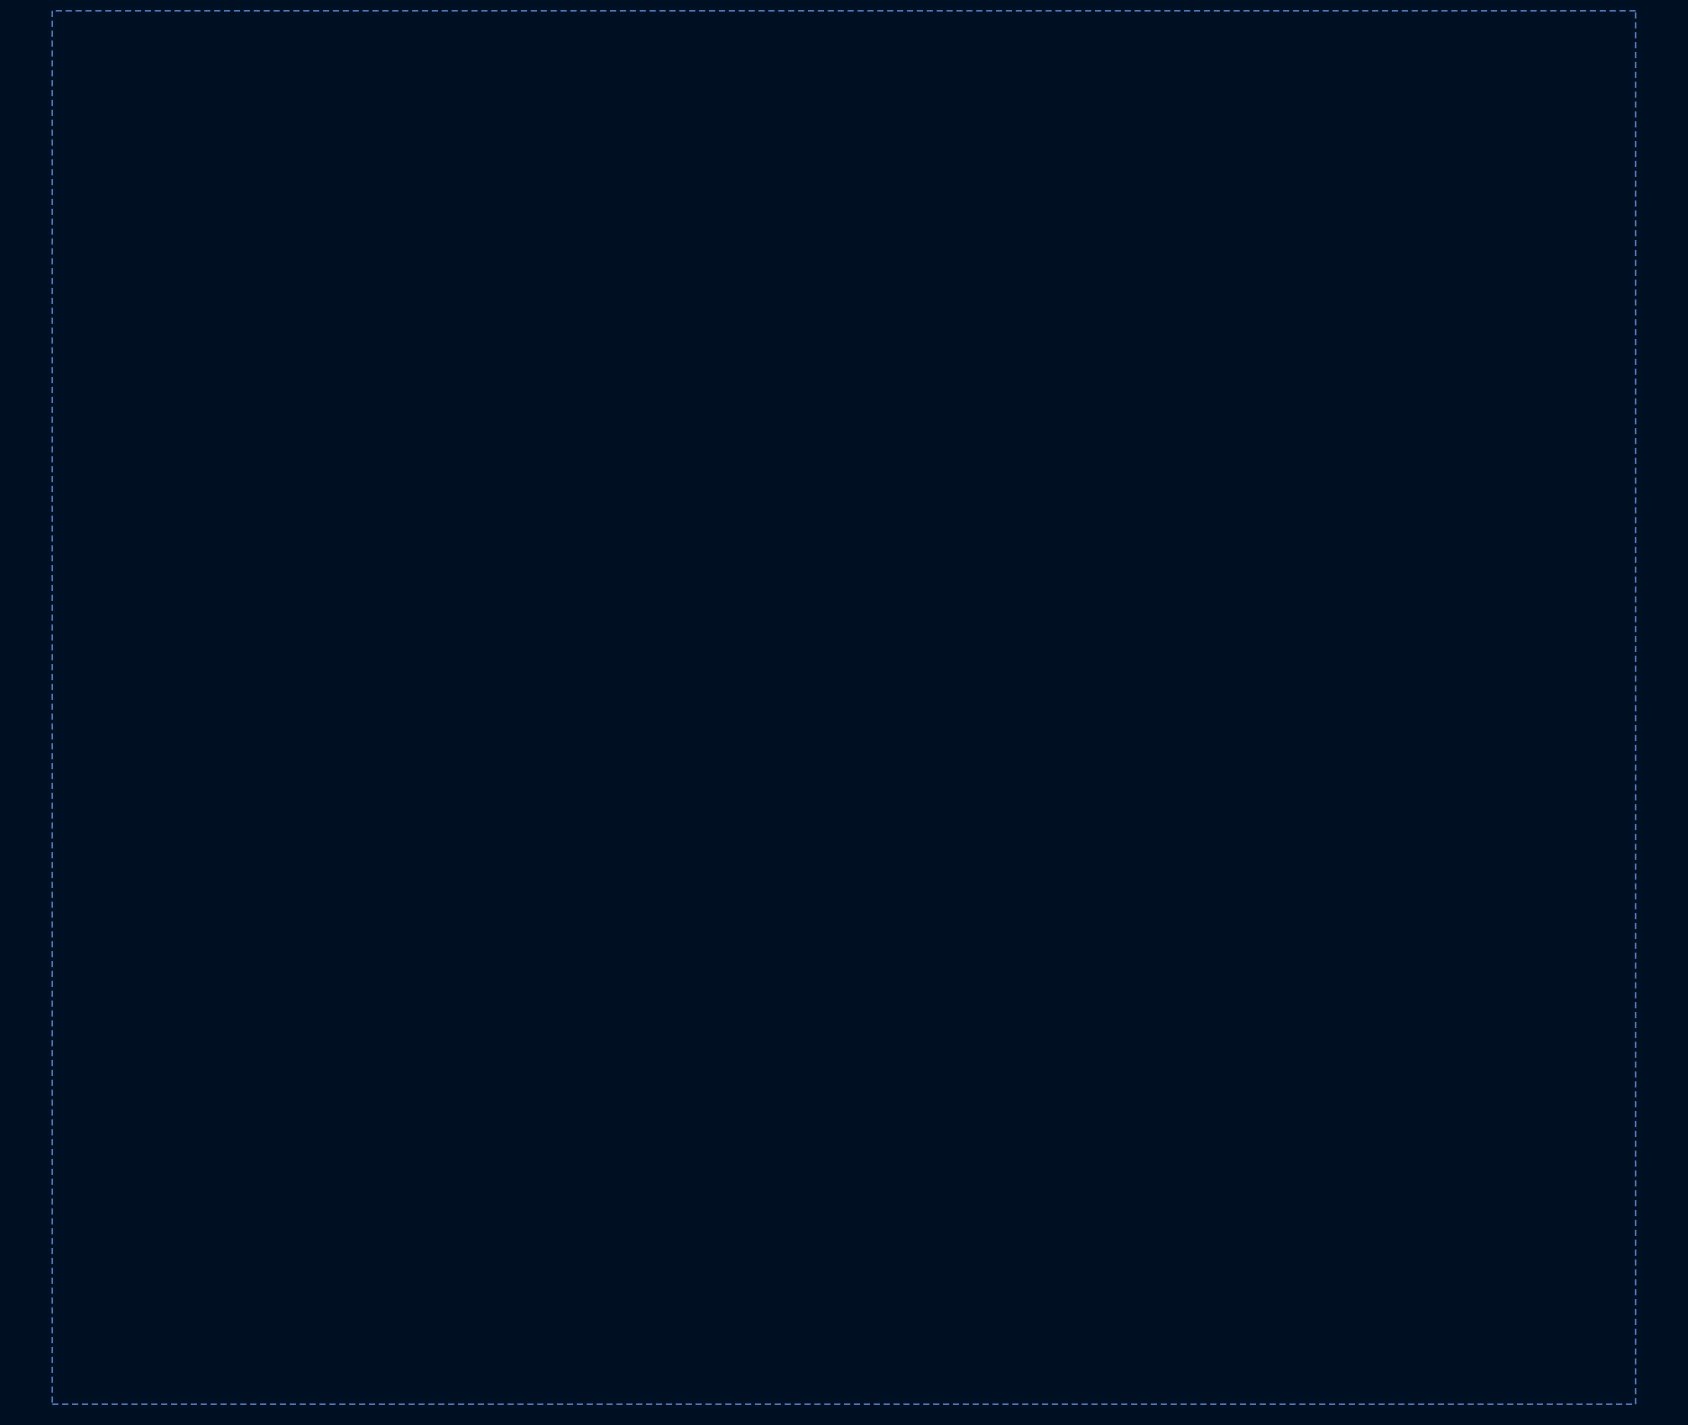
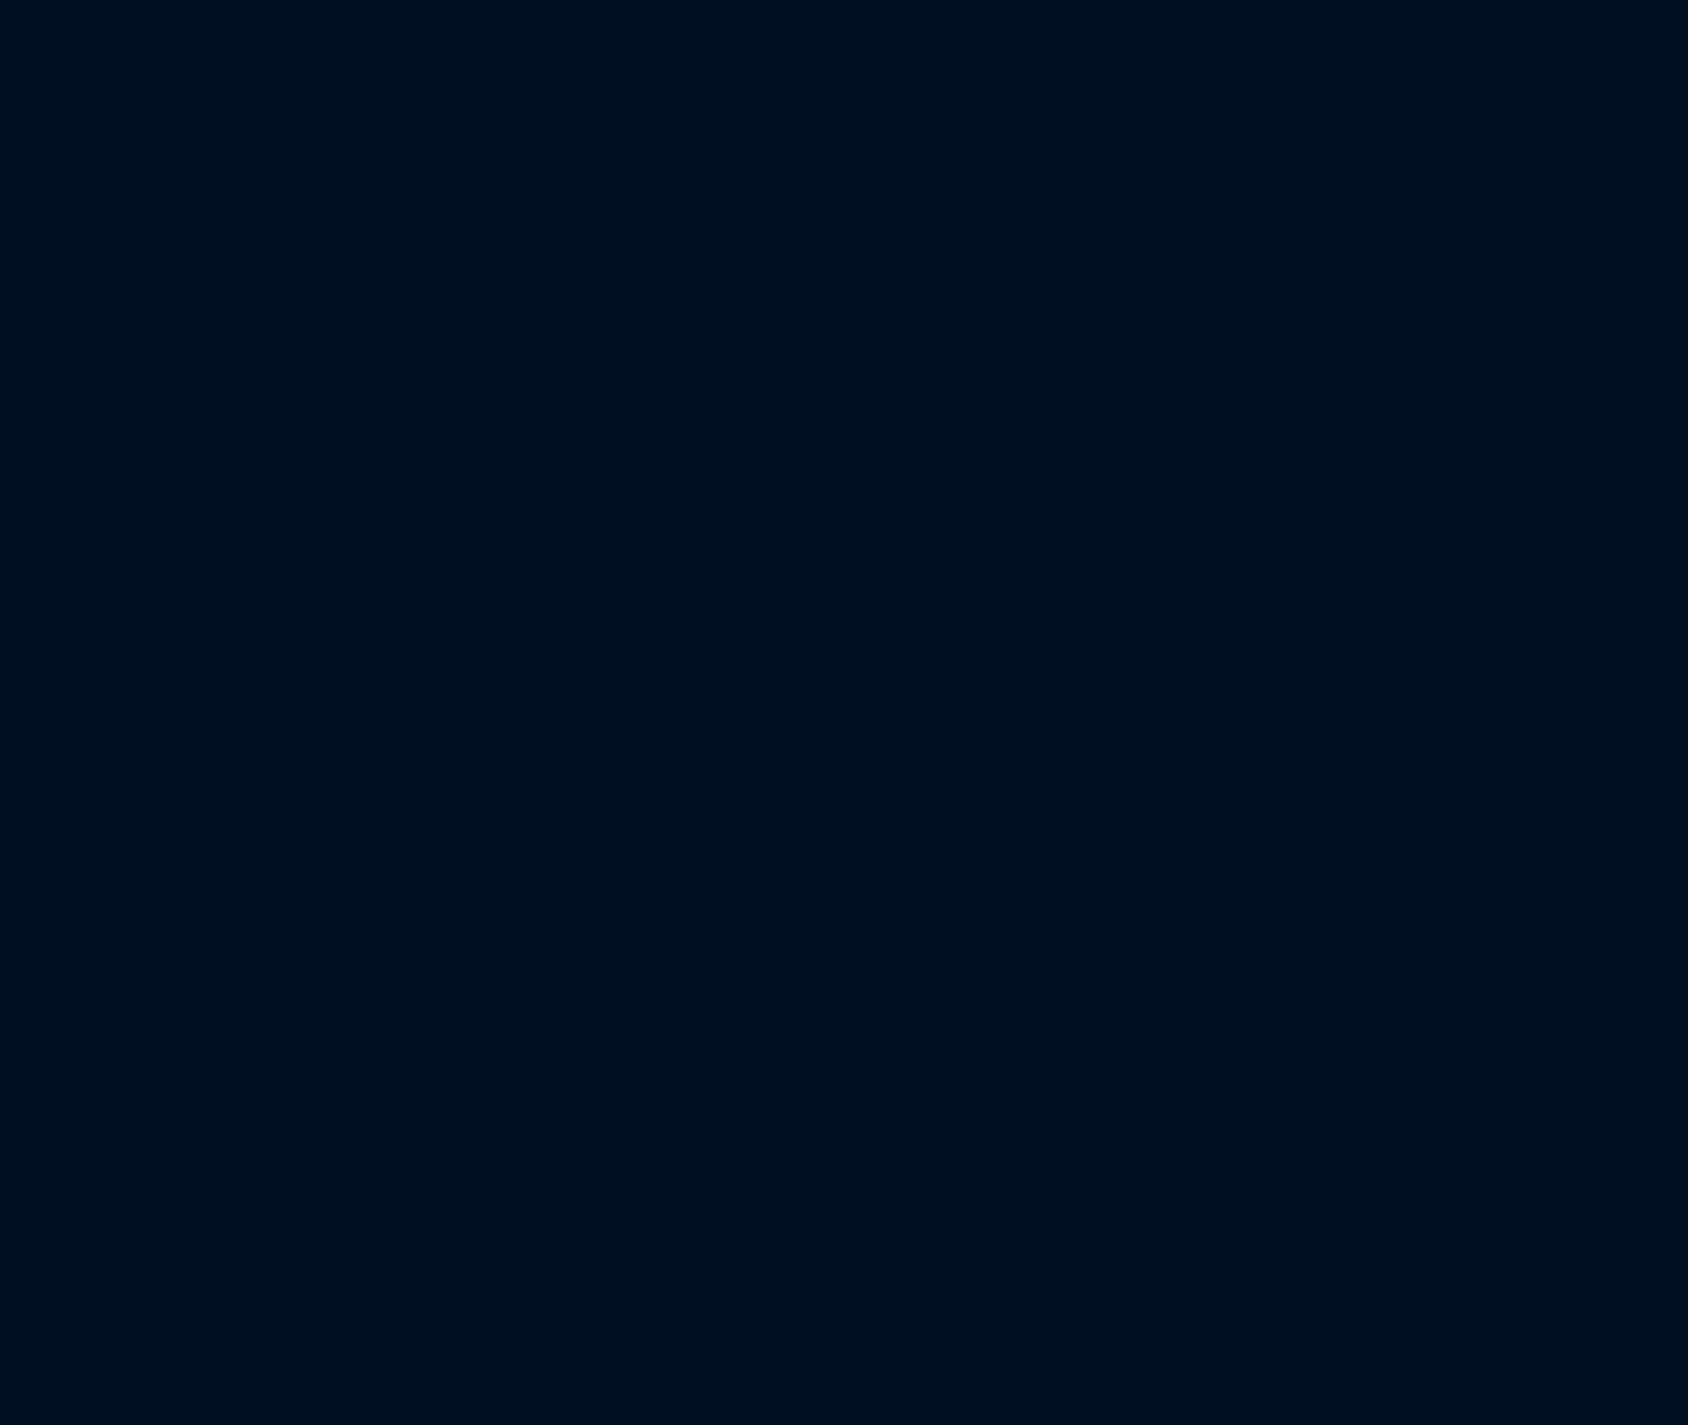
zone outline: (1635, 10) (52, 10) (52, 1404) (1635, 1404) (1635, 10) -> none

